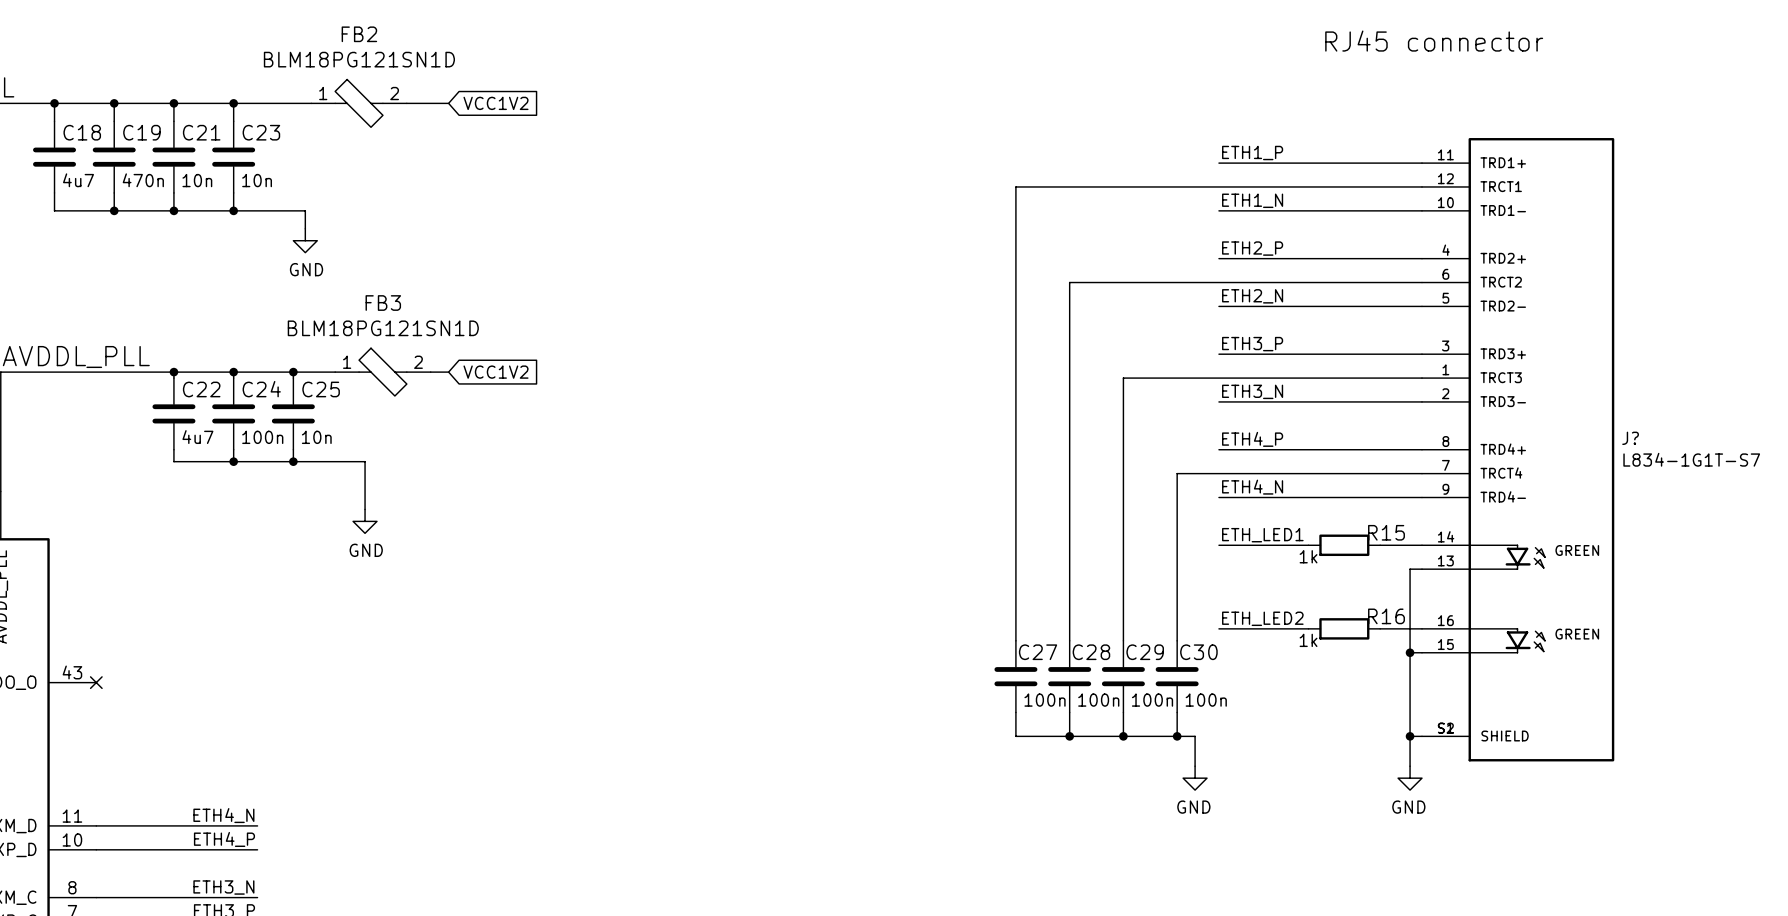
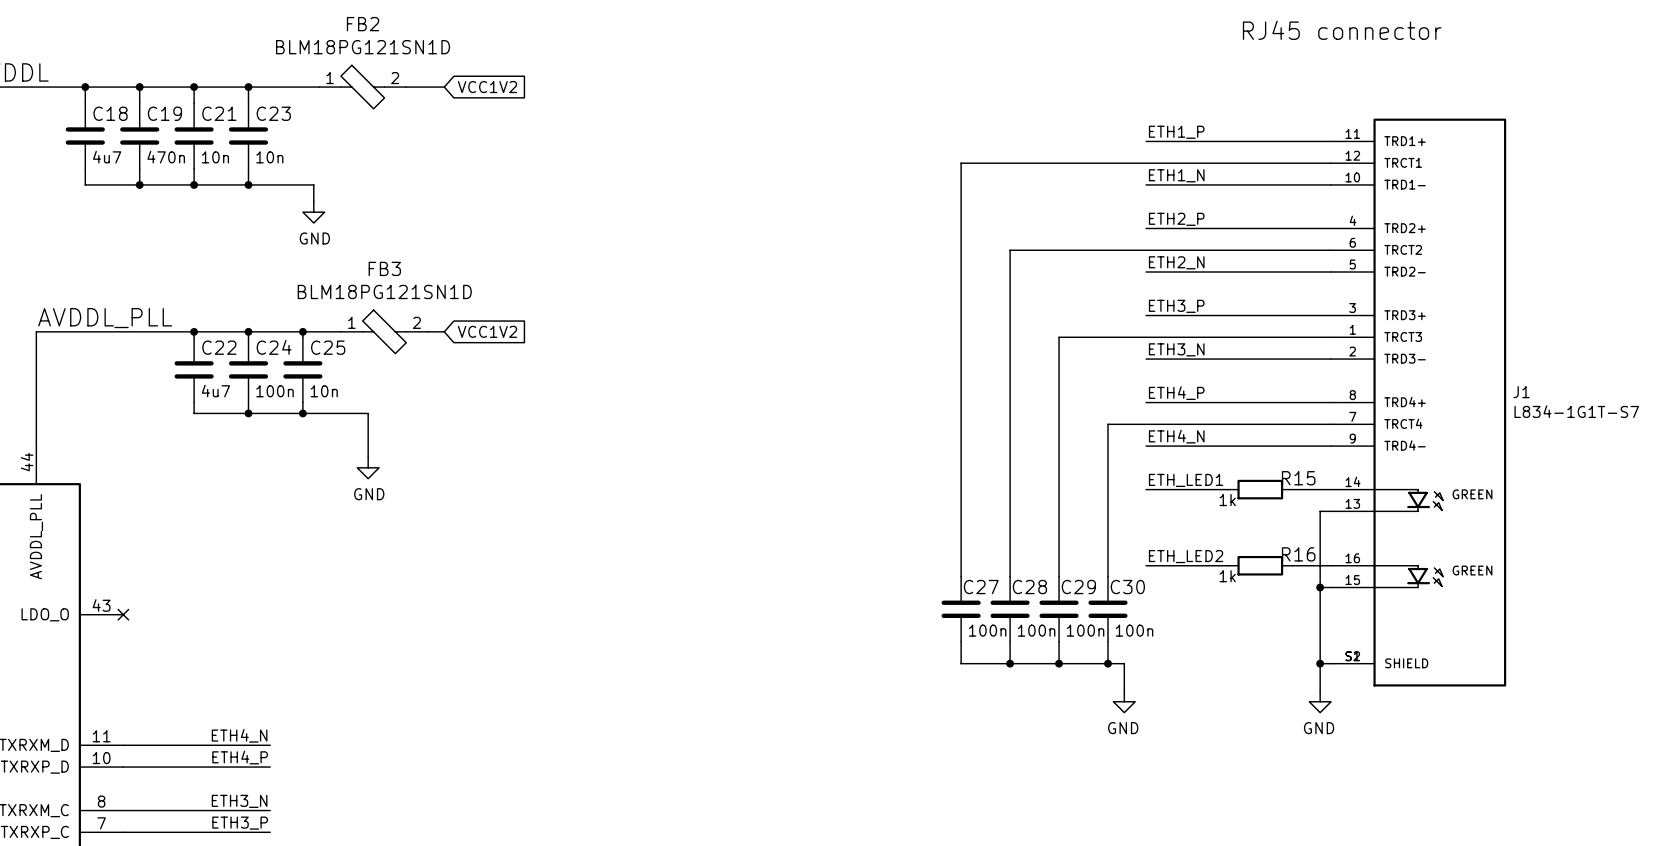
J? name: J? (1630, 438) -> J1 (1521, 392)

